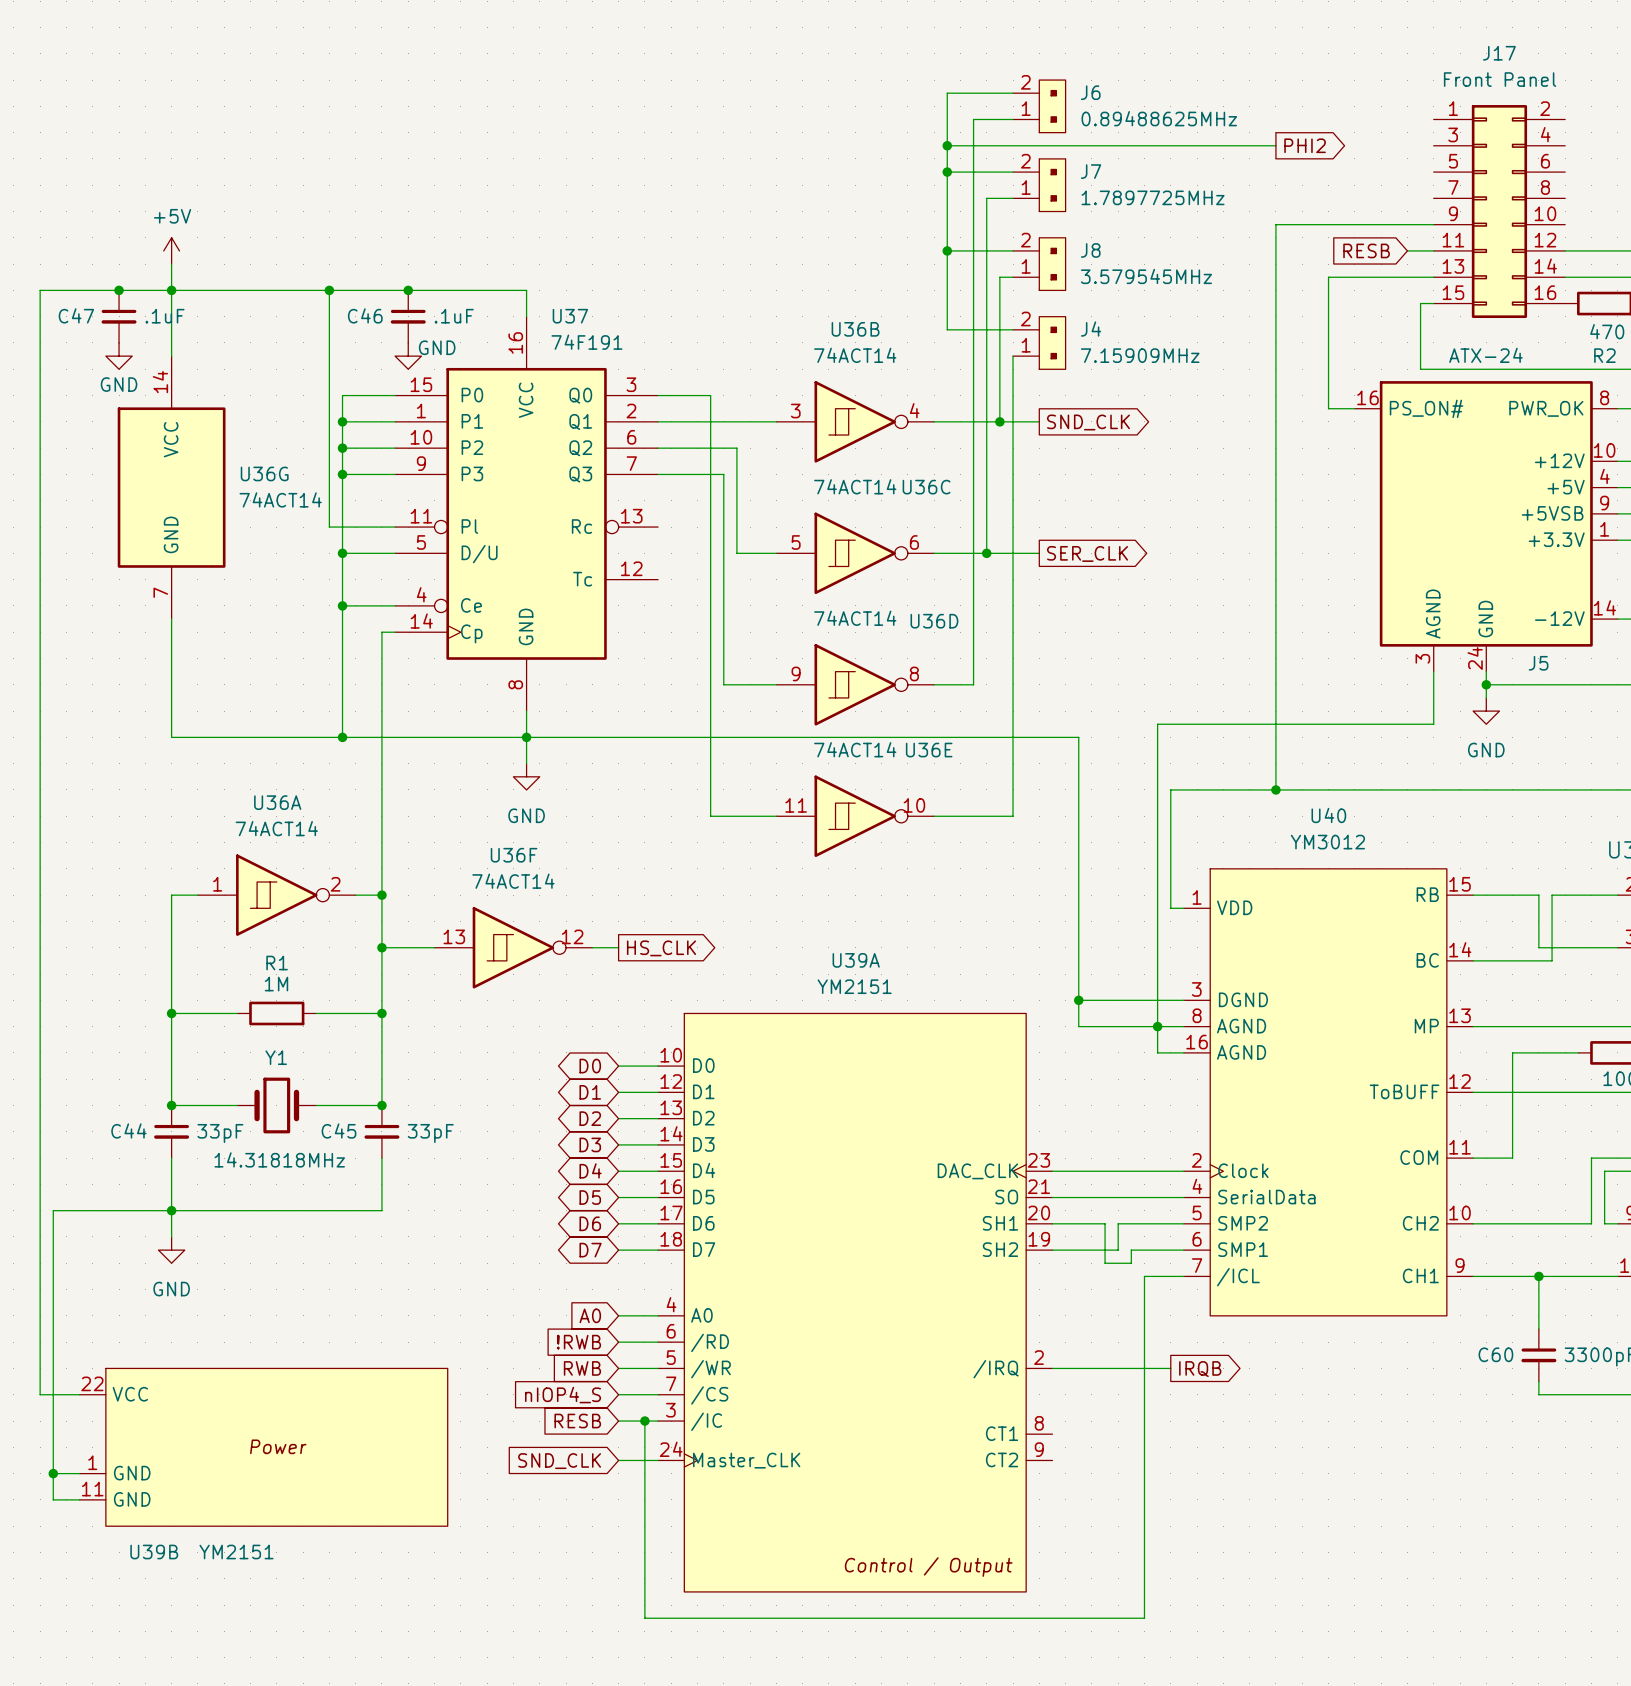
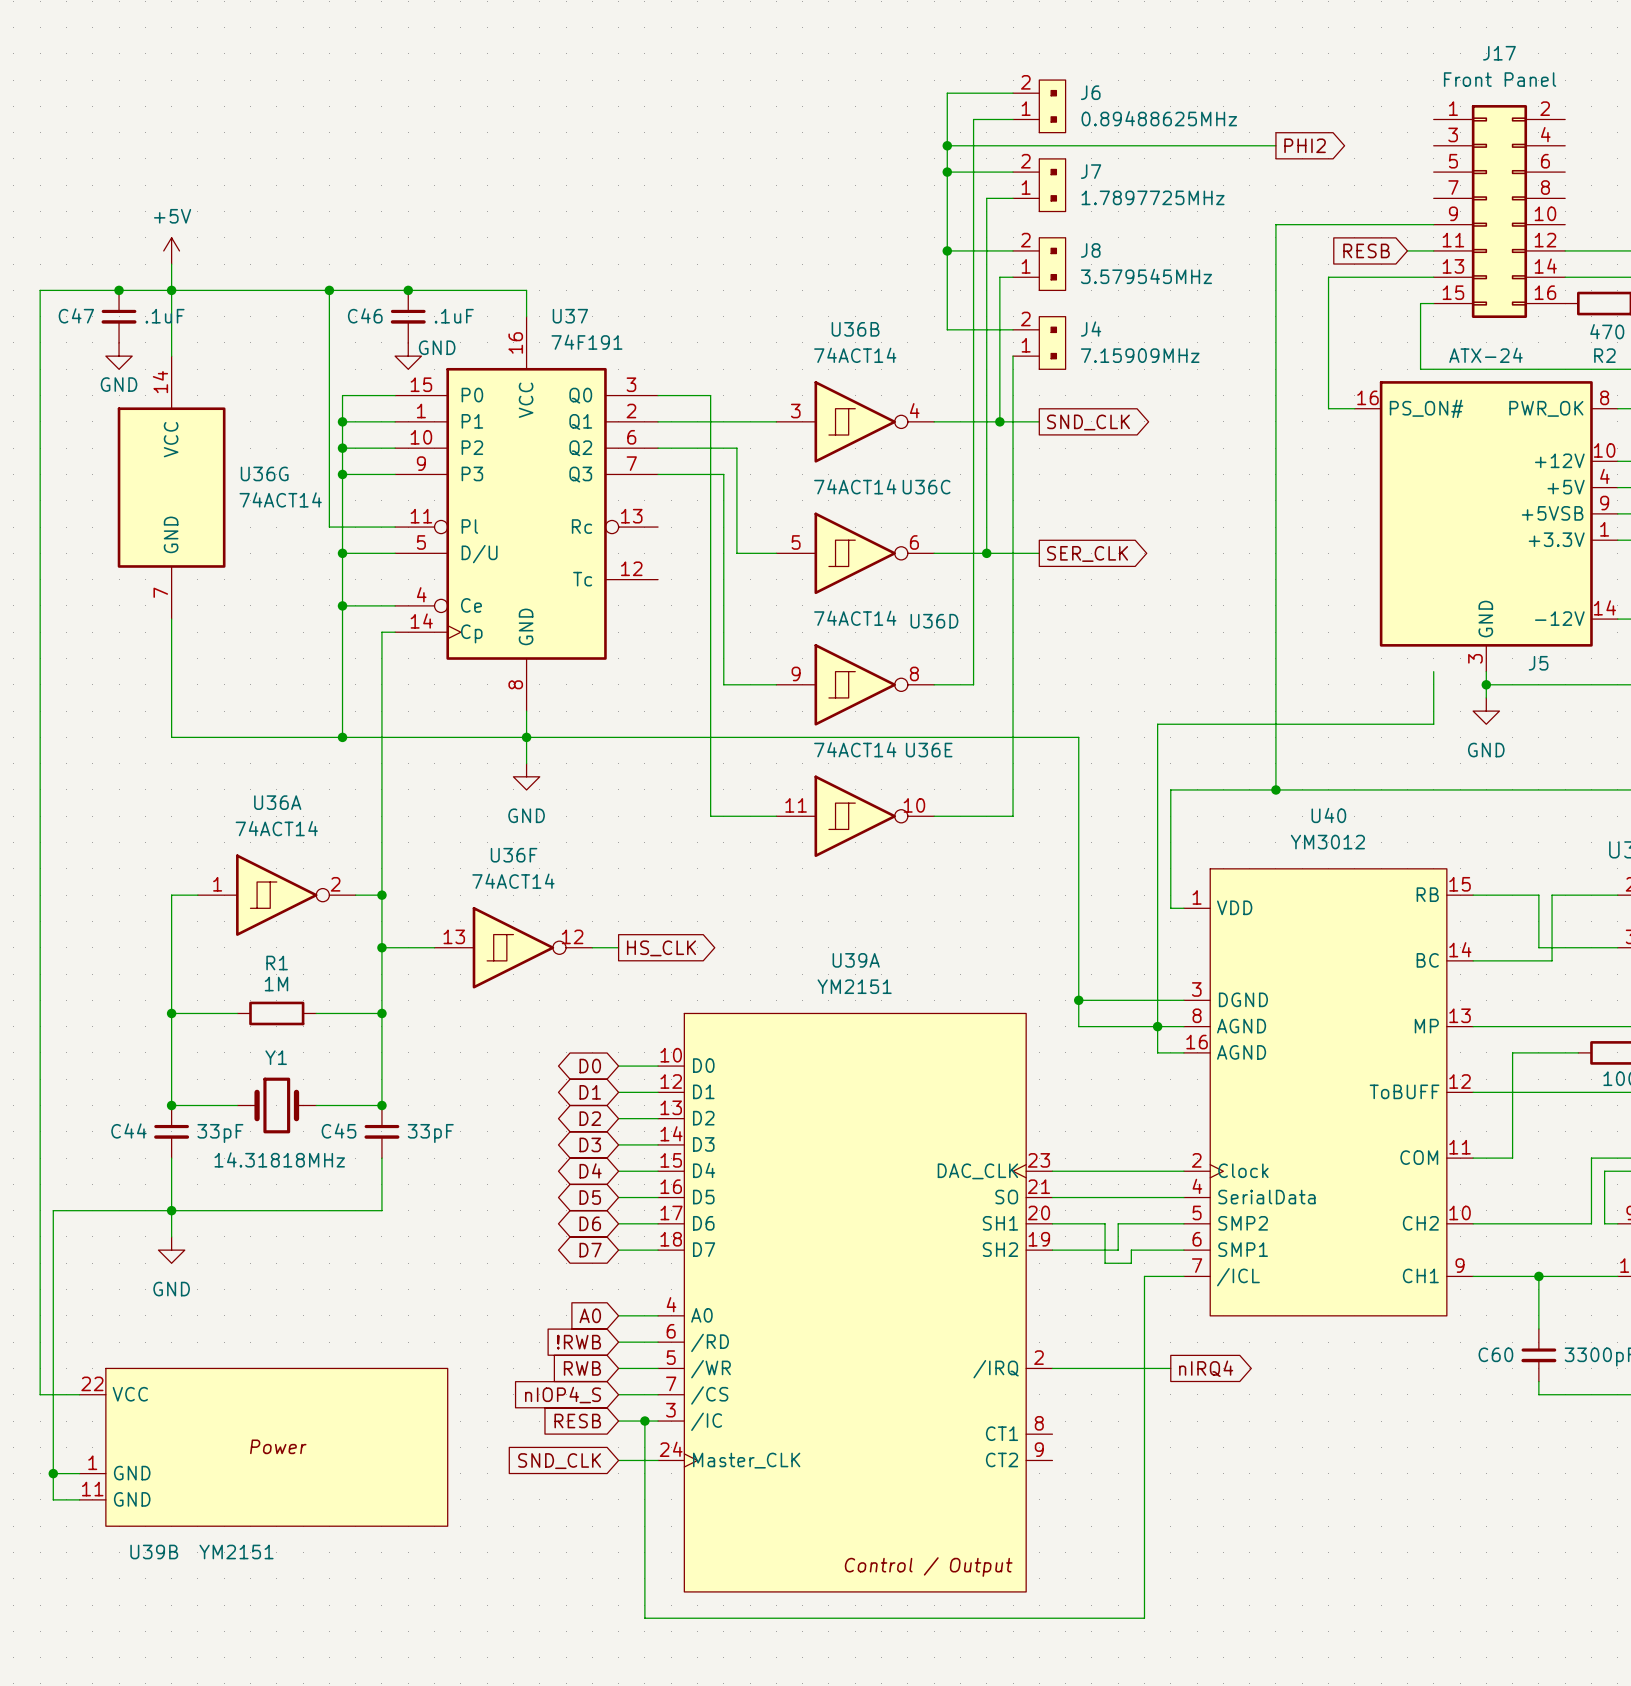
J5 symbol: [1354, 381, 1618, 672] -> [1354, 381, 1618, 672]
global label: IRQB (1200, 1369) -> nIRQ4 (1206, 1368)

